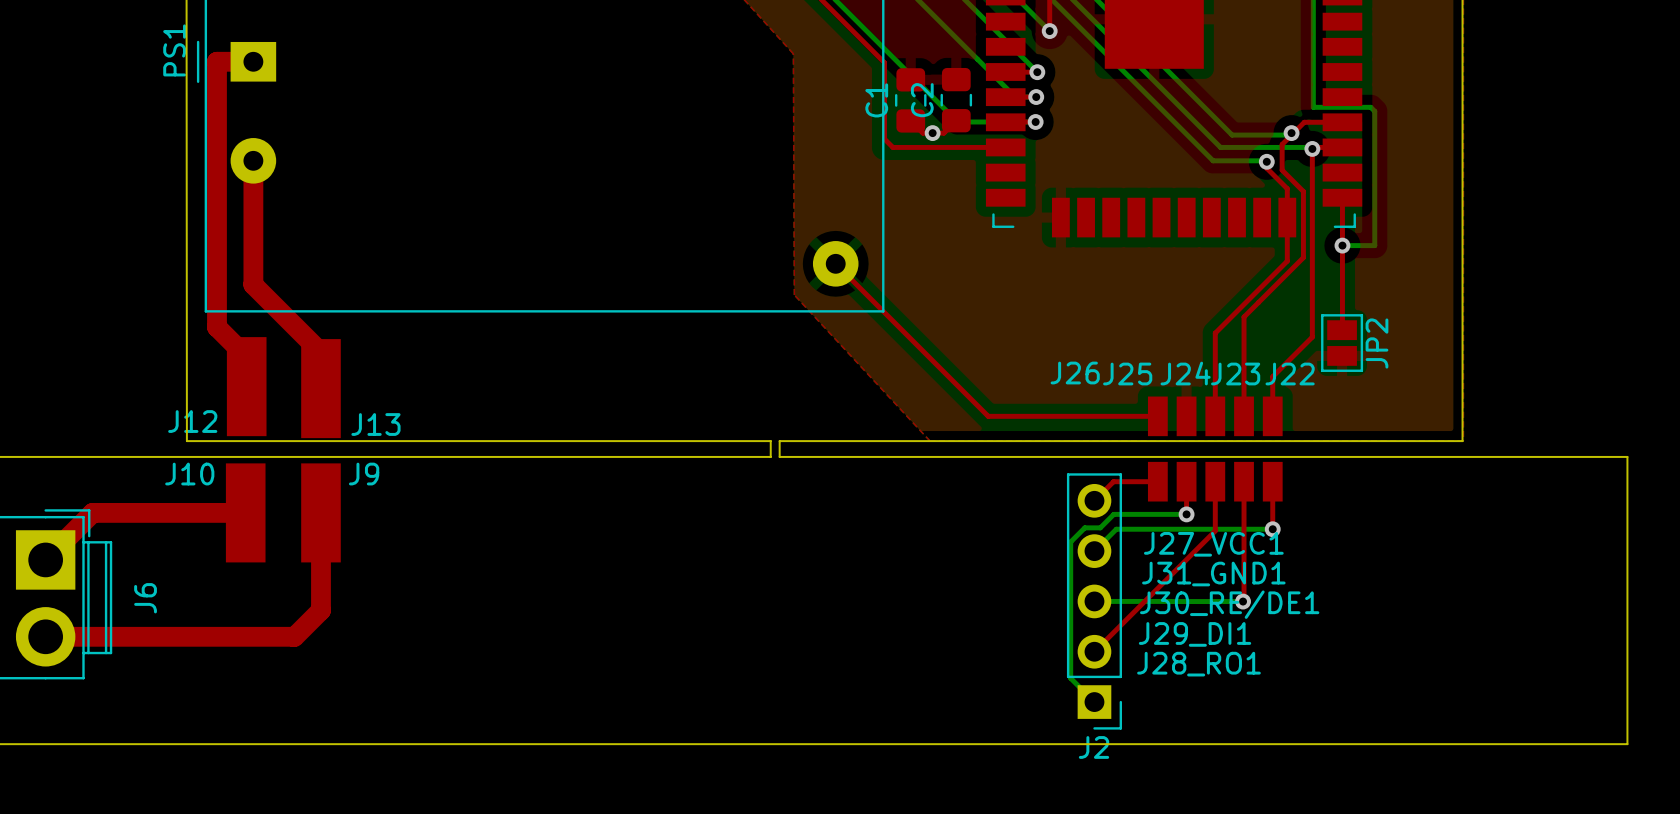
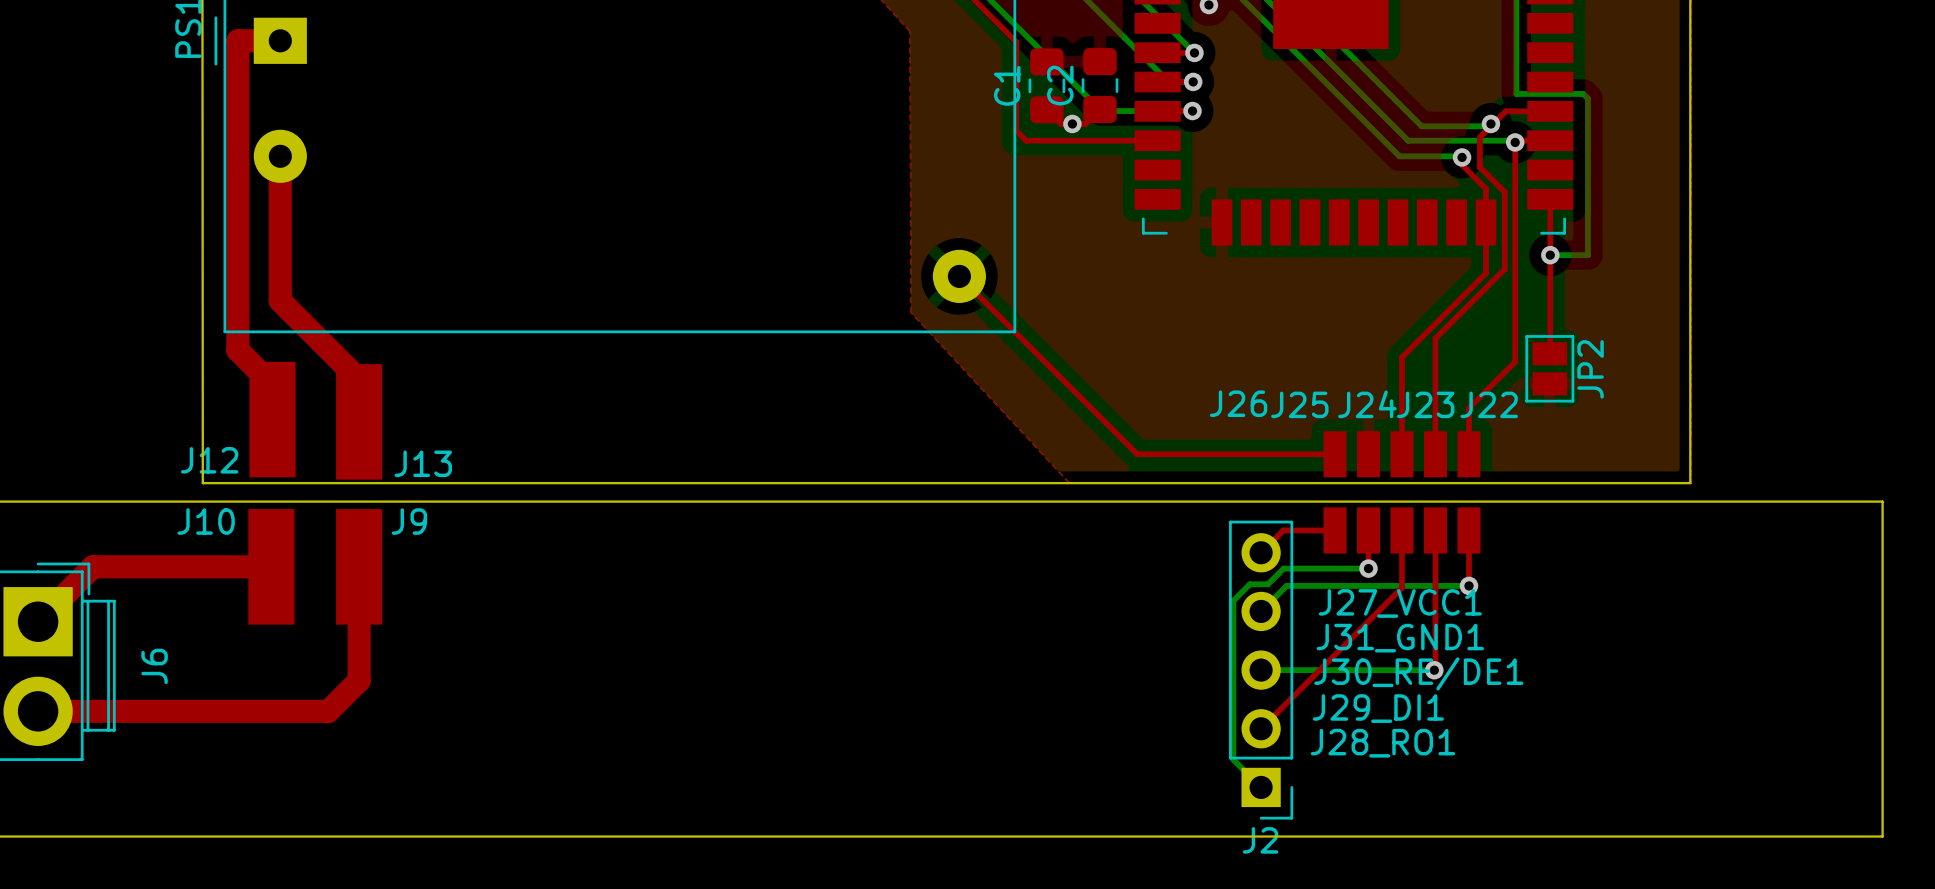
board edge: (770, 441) (770, 456) -> (883, 483) (894, 483)
board edge: (779, 441) (779, 456) -> (883, 501) (894, 501)

